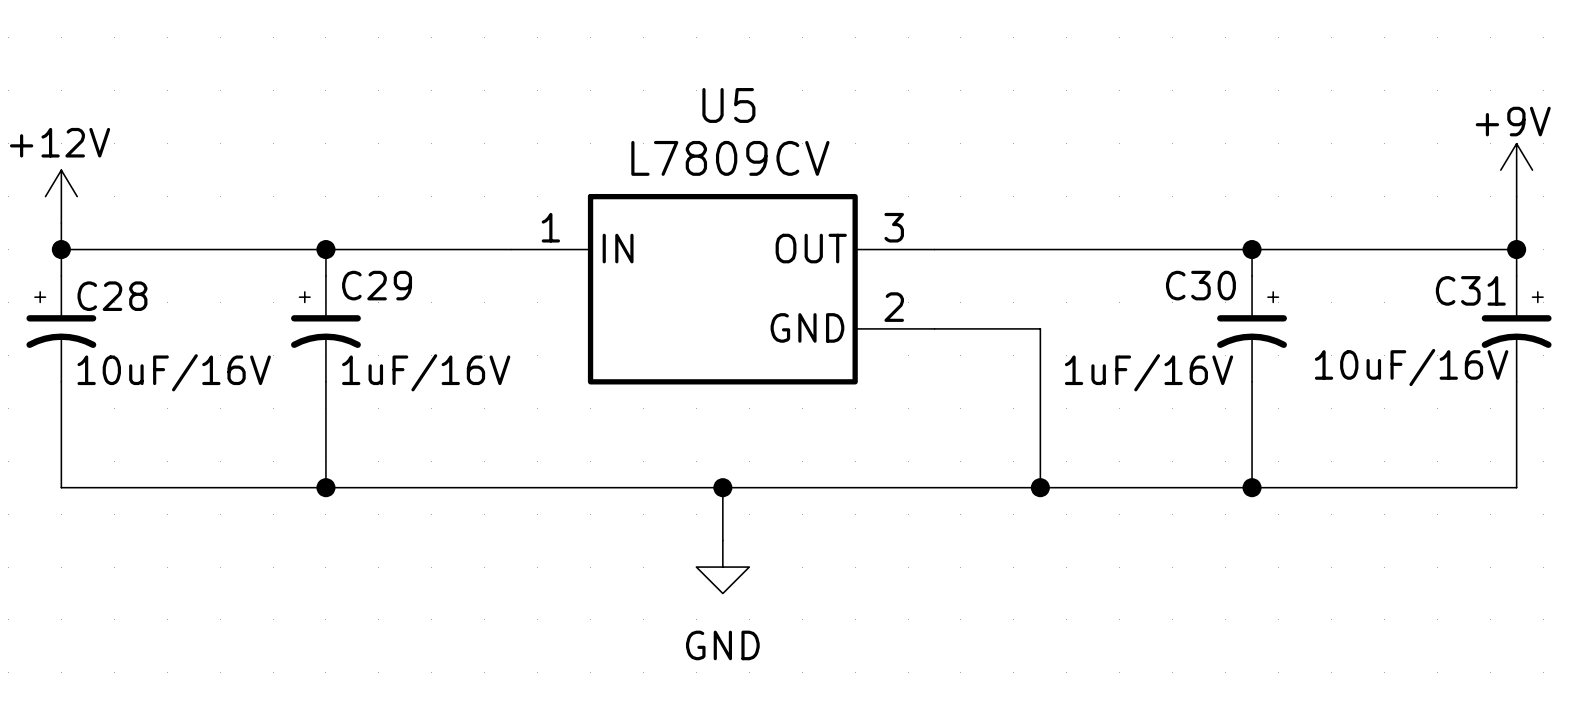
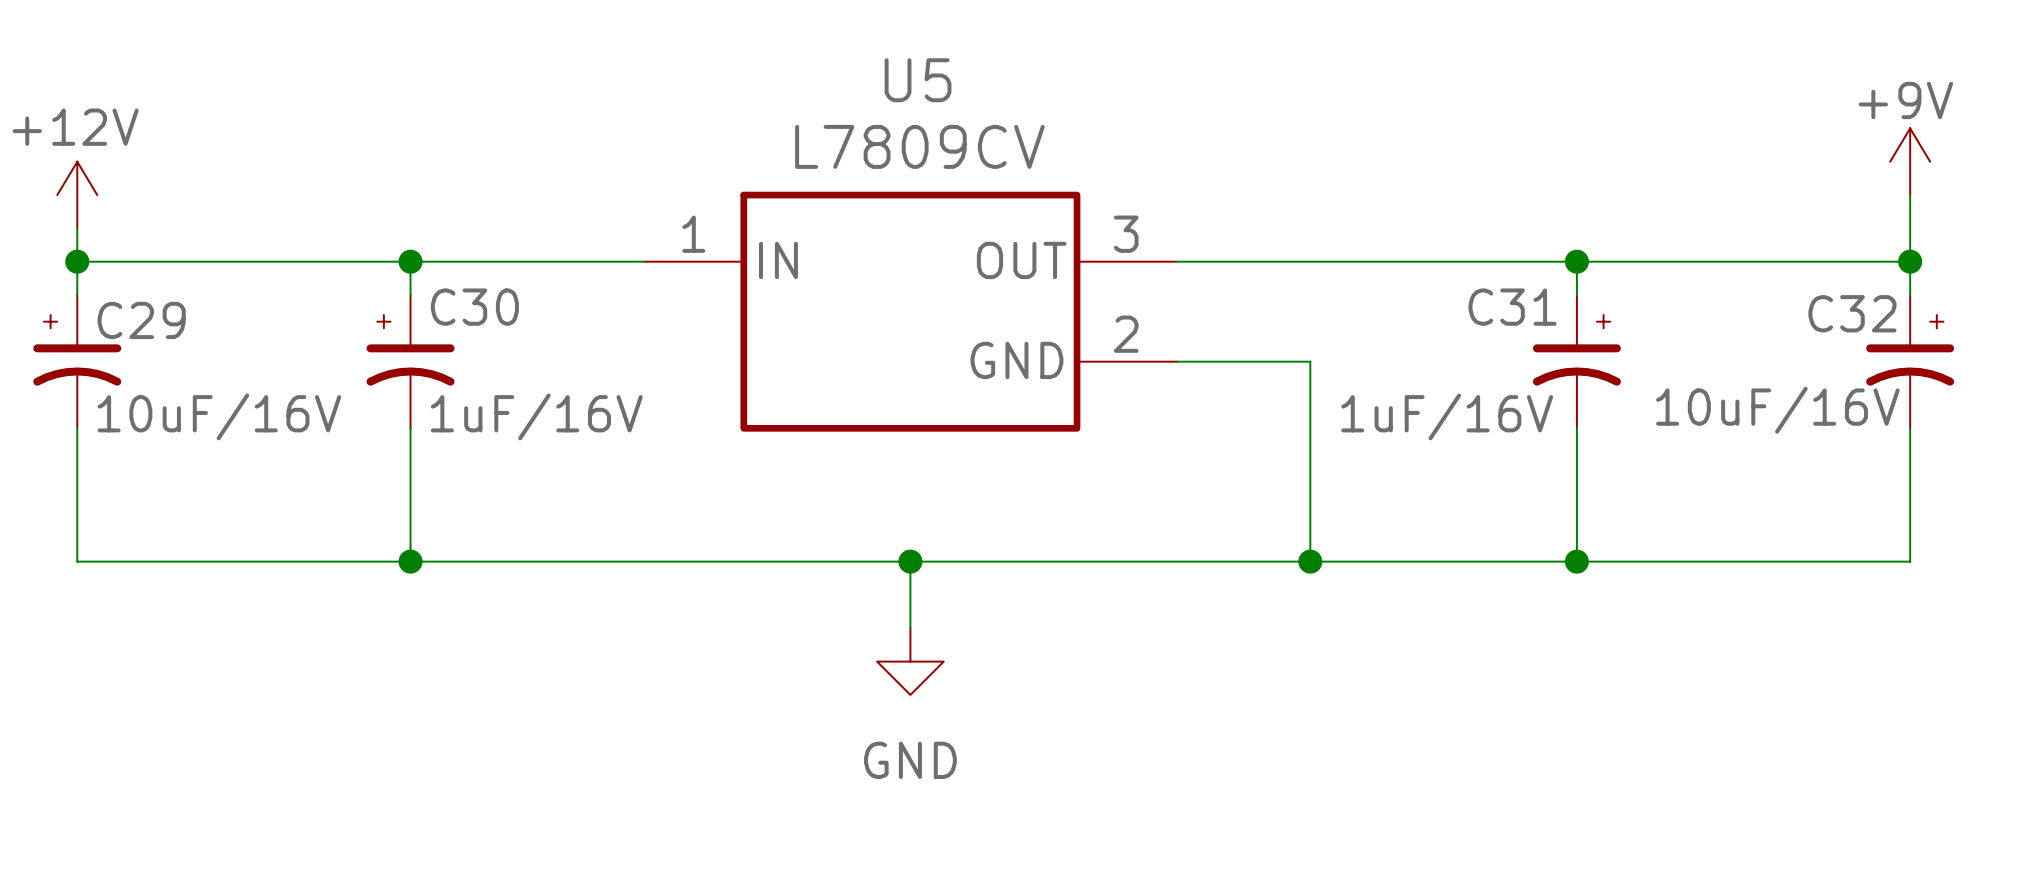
C29 name: C29 (377, 285) -> C30 (474, 307)
C30 name: C30 (1200, 285) -> C31 (1512, 307)
C31 name: C31 (1470, 290) -> C32 (1852, 313)
C28 name: C28 (112, 296) -> C29 (141, 320)

